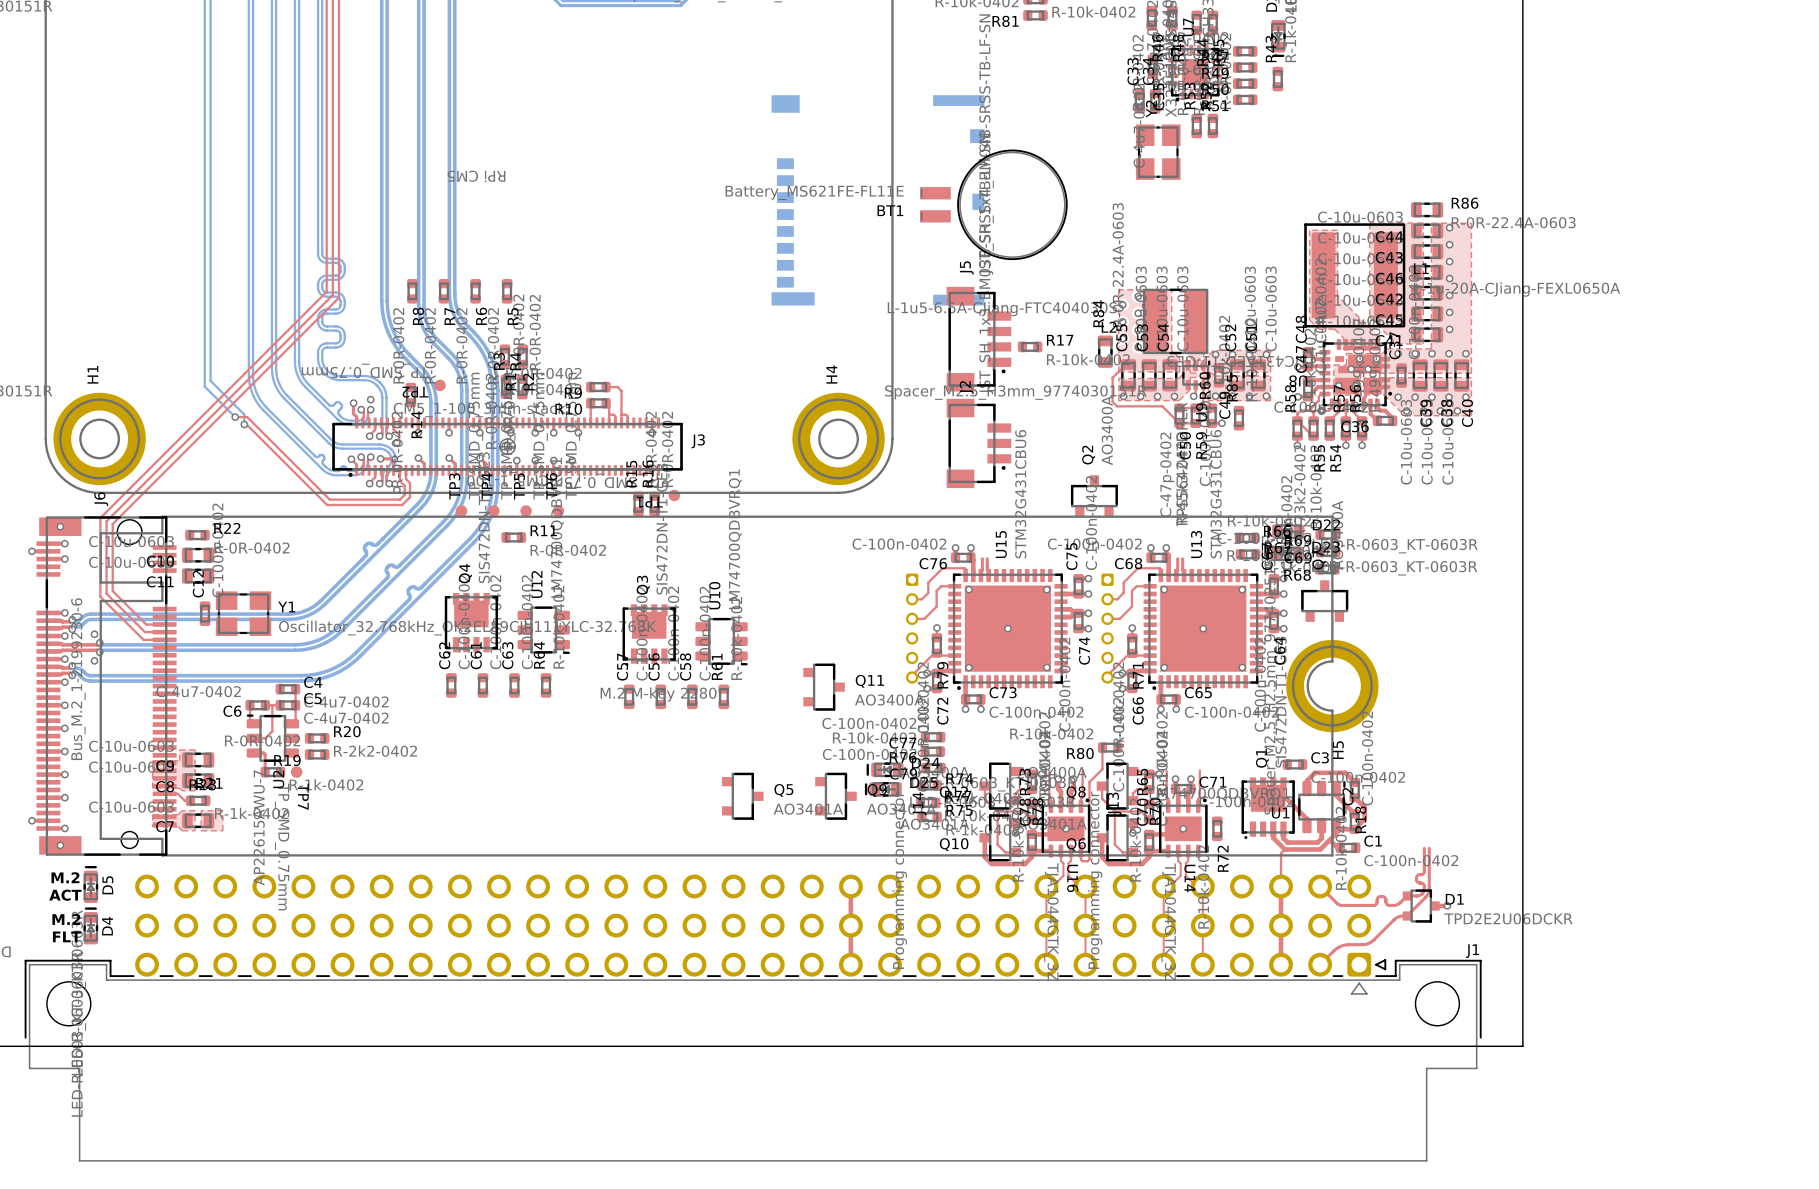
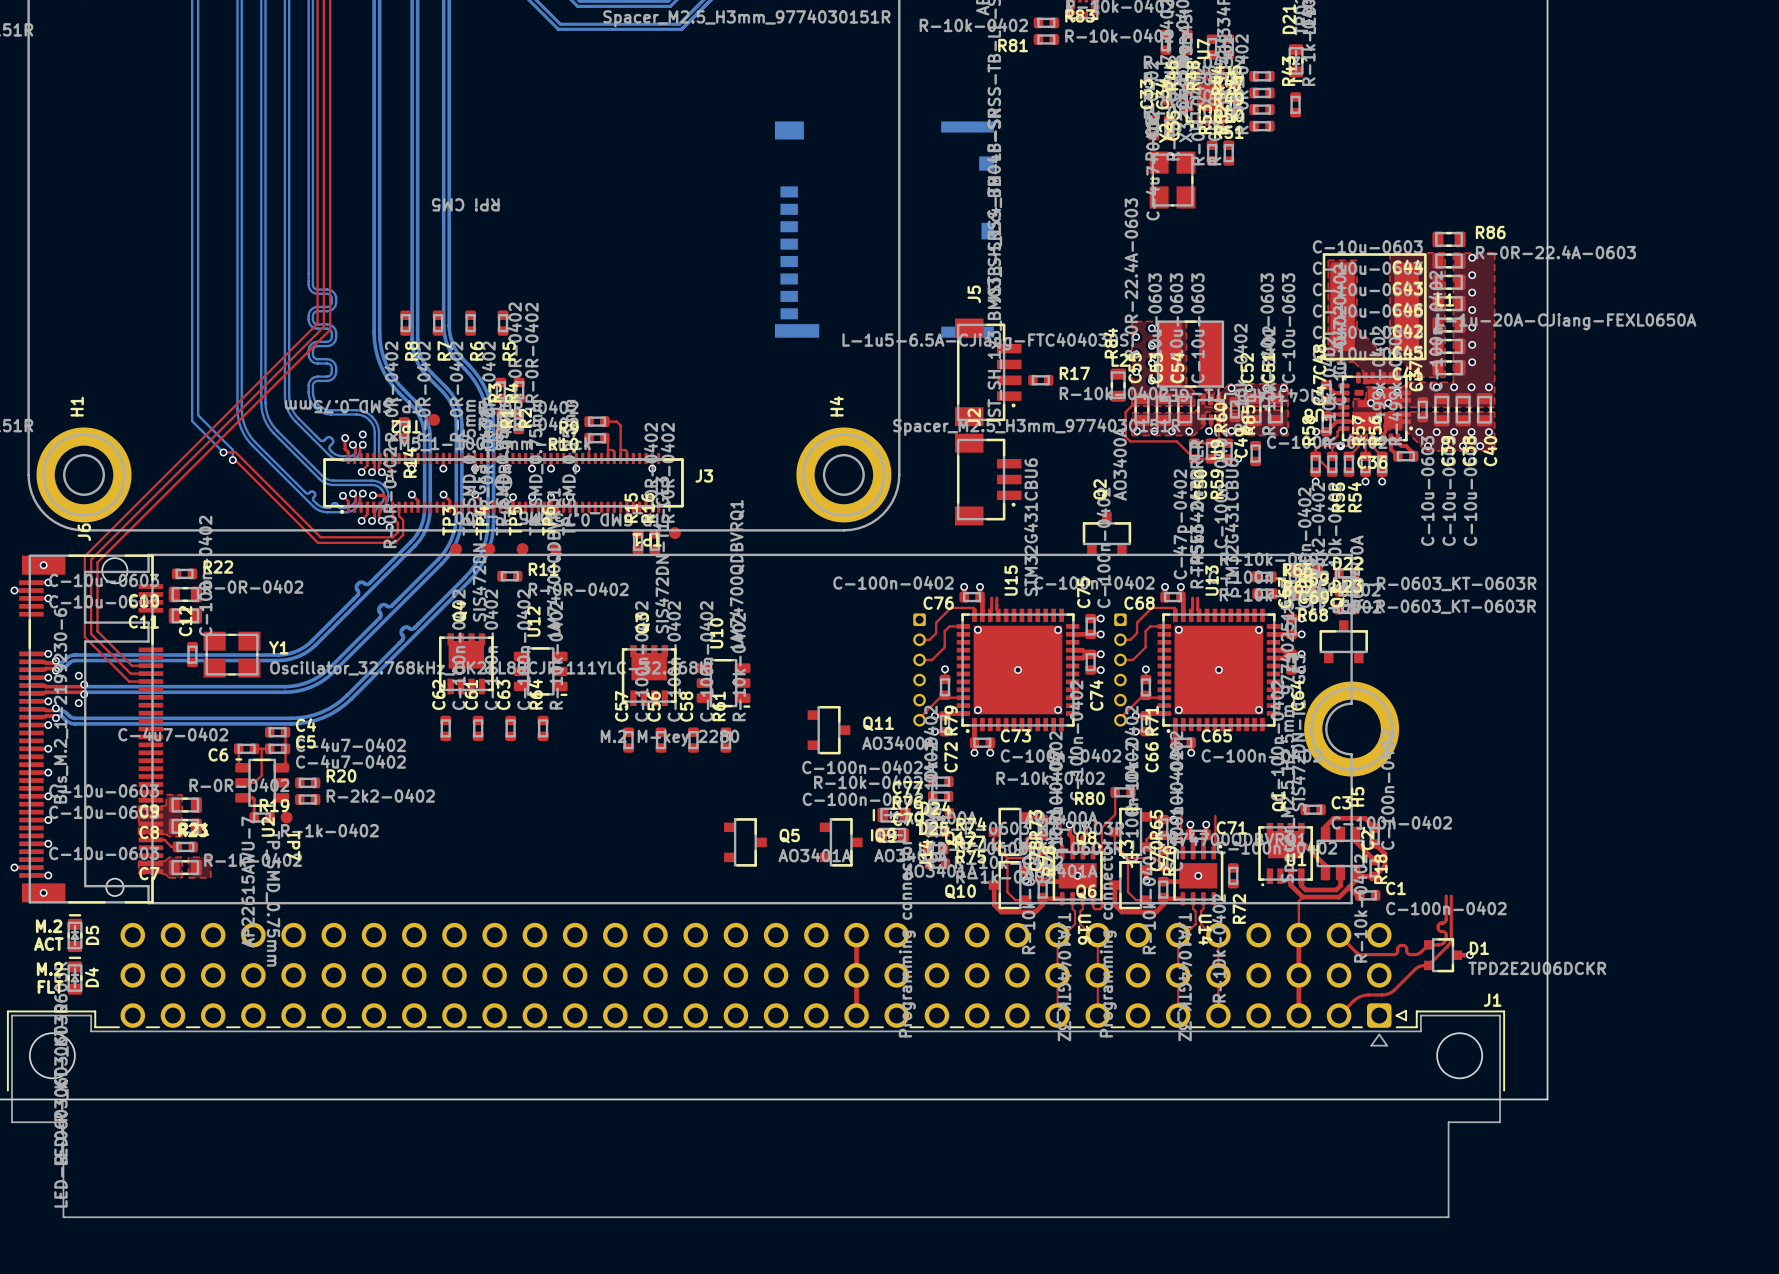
BT1: Battery_MS621FE-FL11E (993, 204) -> none

